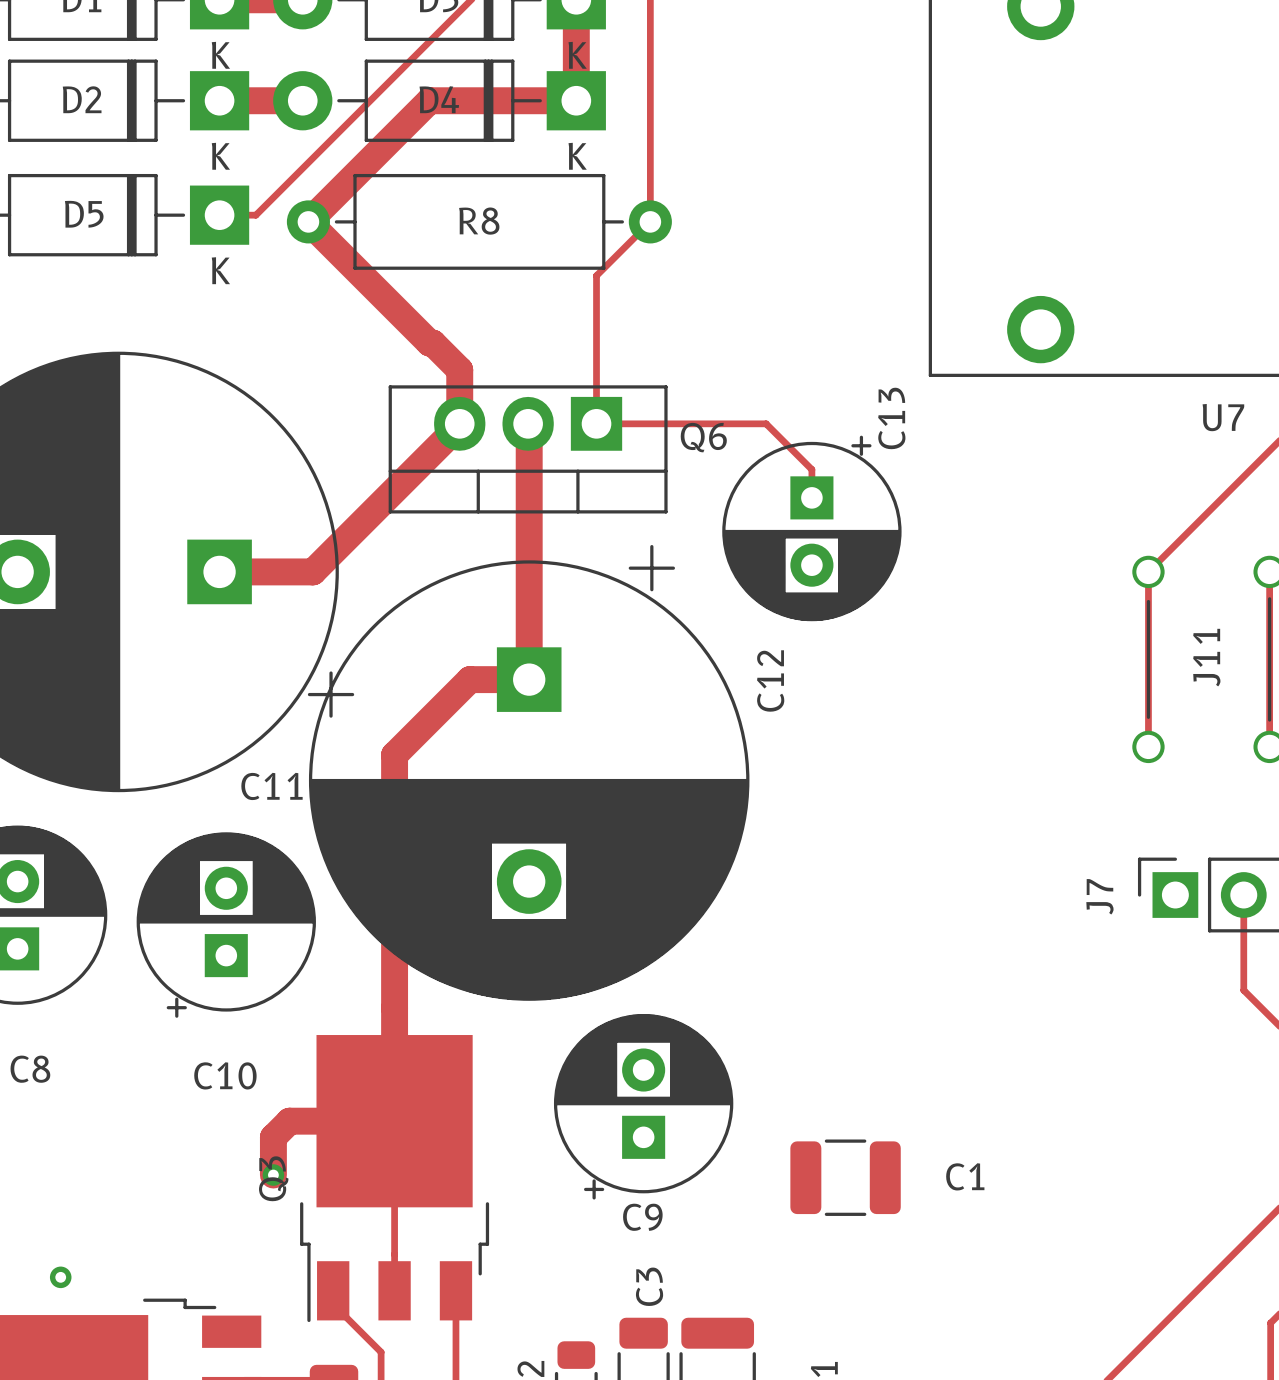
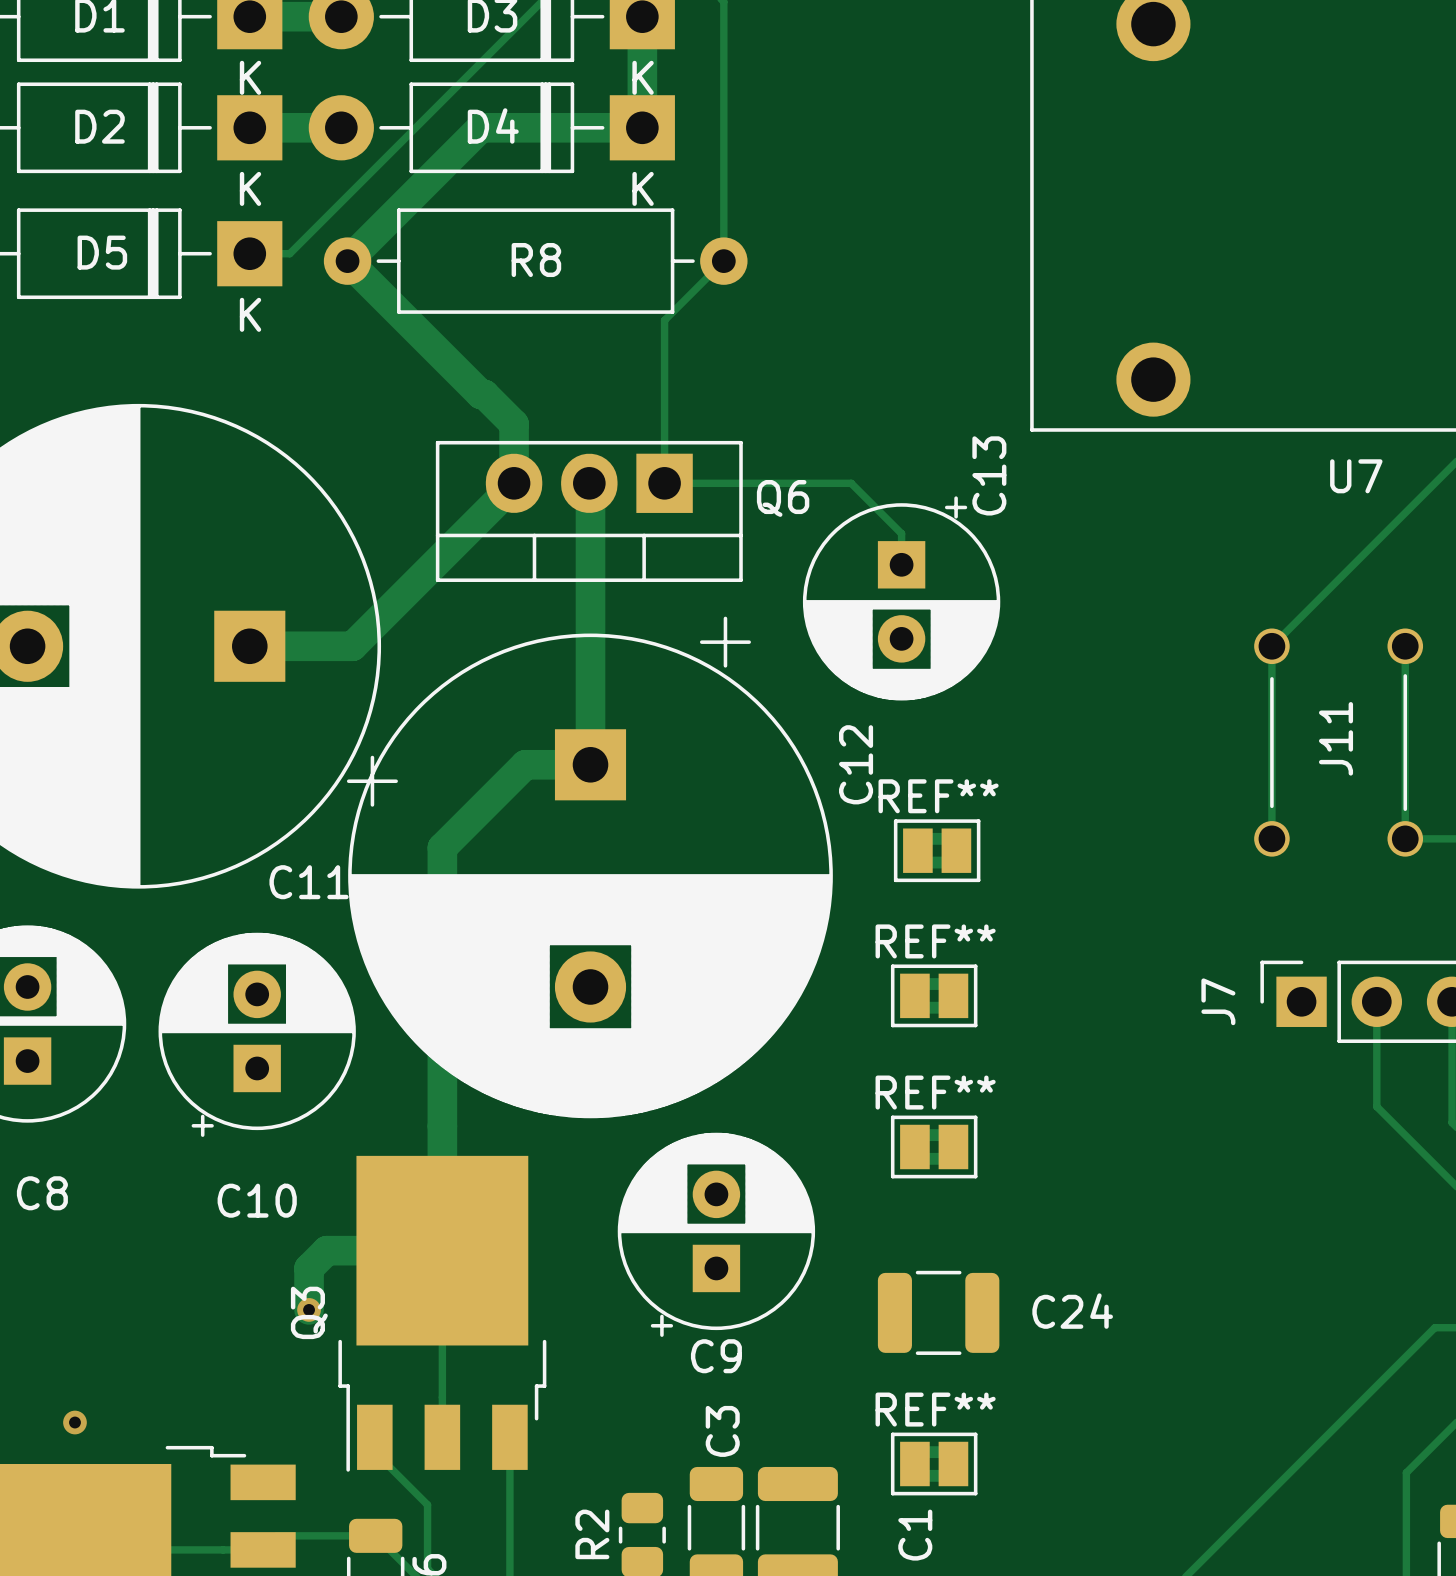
REF**: none -> (937, 850)
REF**: none -> (934, 995)
REF**: none -> (934, 1146)
C1 name: C1 (965, 1176) -> C24 (1072, 1311)
REF**: none -> (934, 1463)

